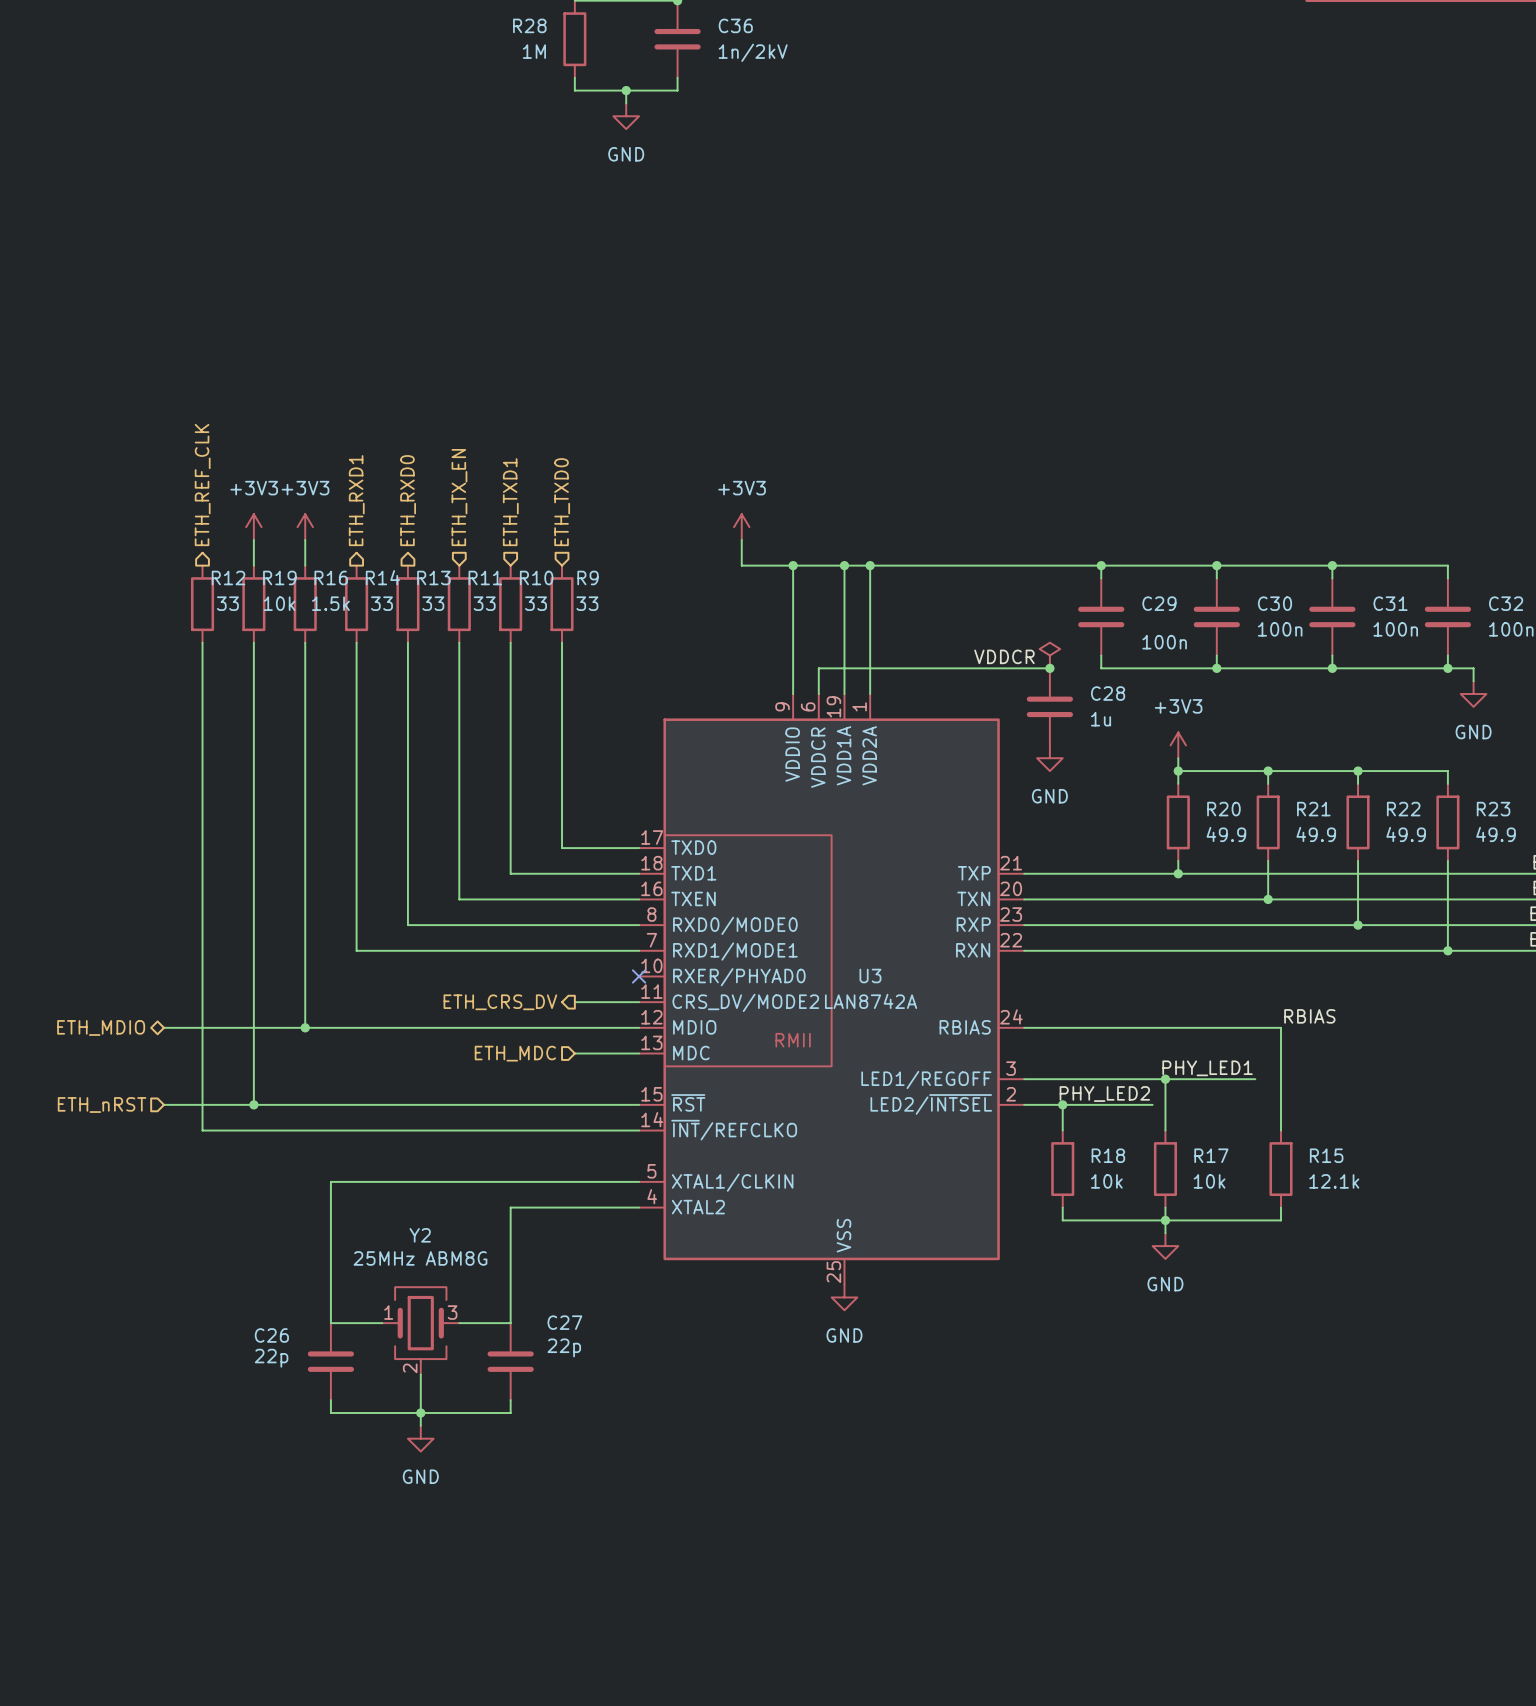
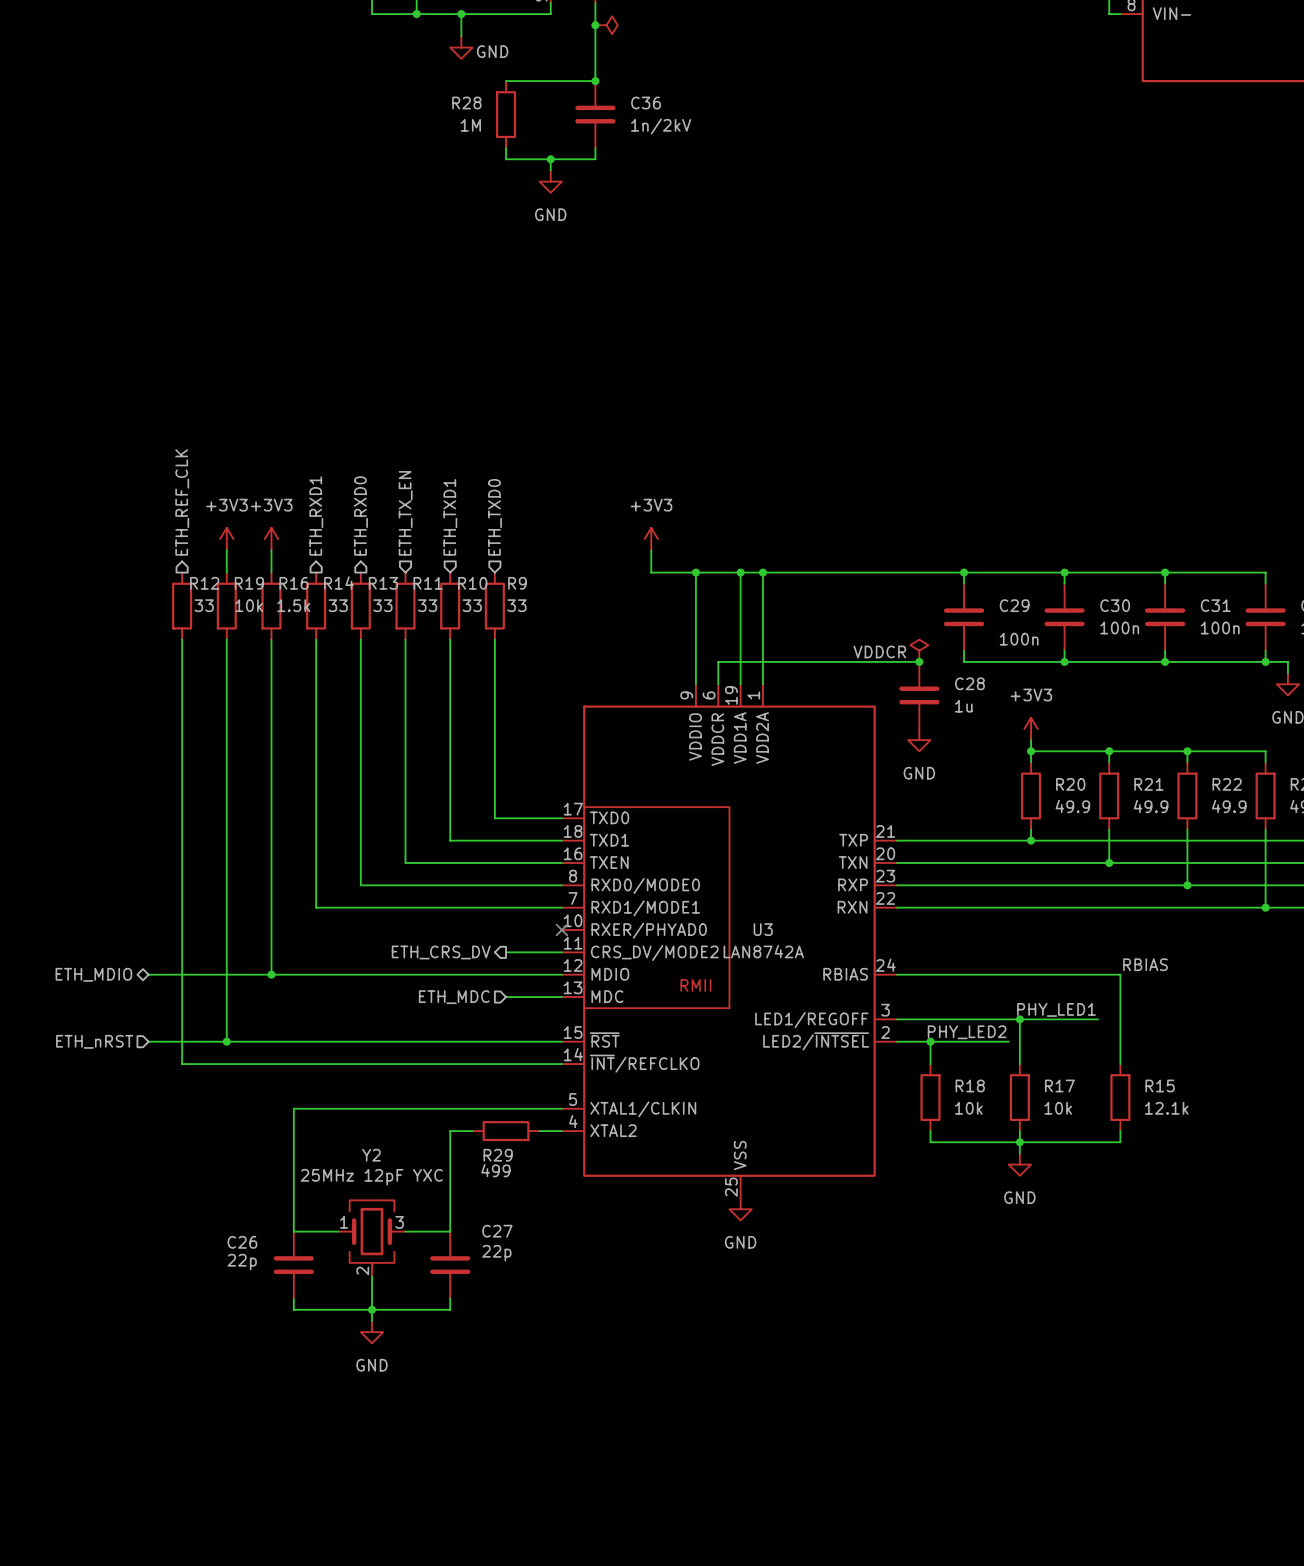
wire: (536, 1207) (613, 1207) -> none
R29: none -> 499 (506, 1131)
Y2 value: 25MHz ABM8G (420, 1258) -> 25MHz 12pF YXC (371, 1177)

